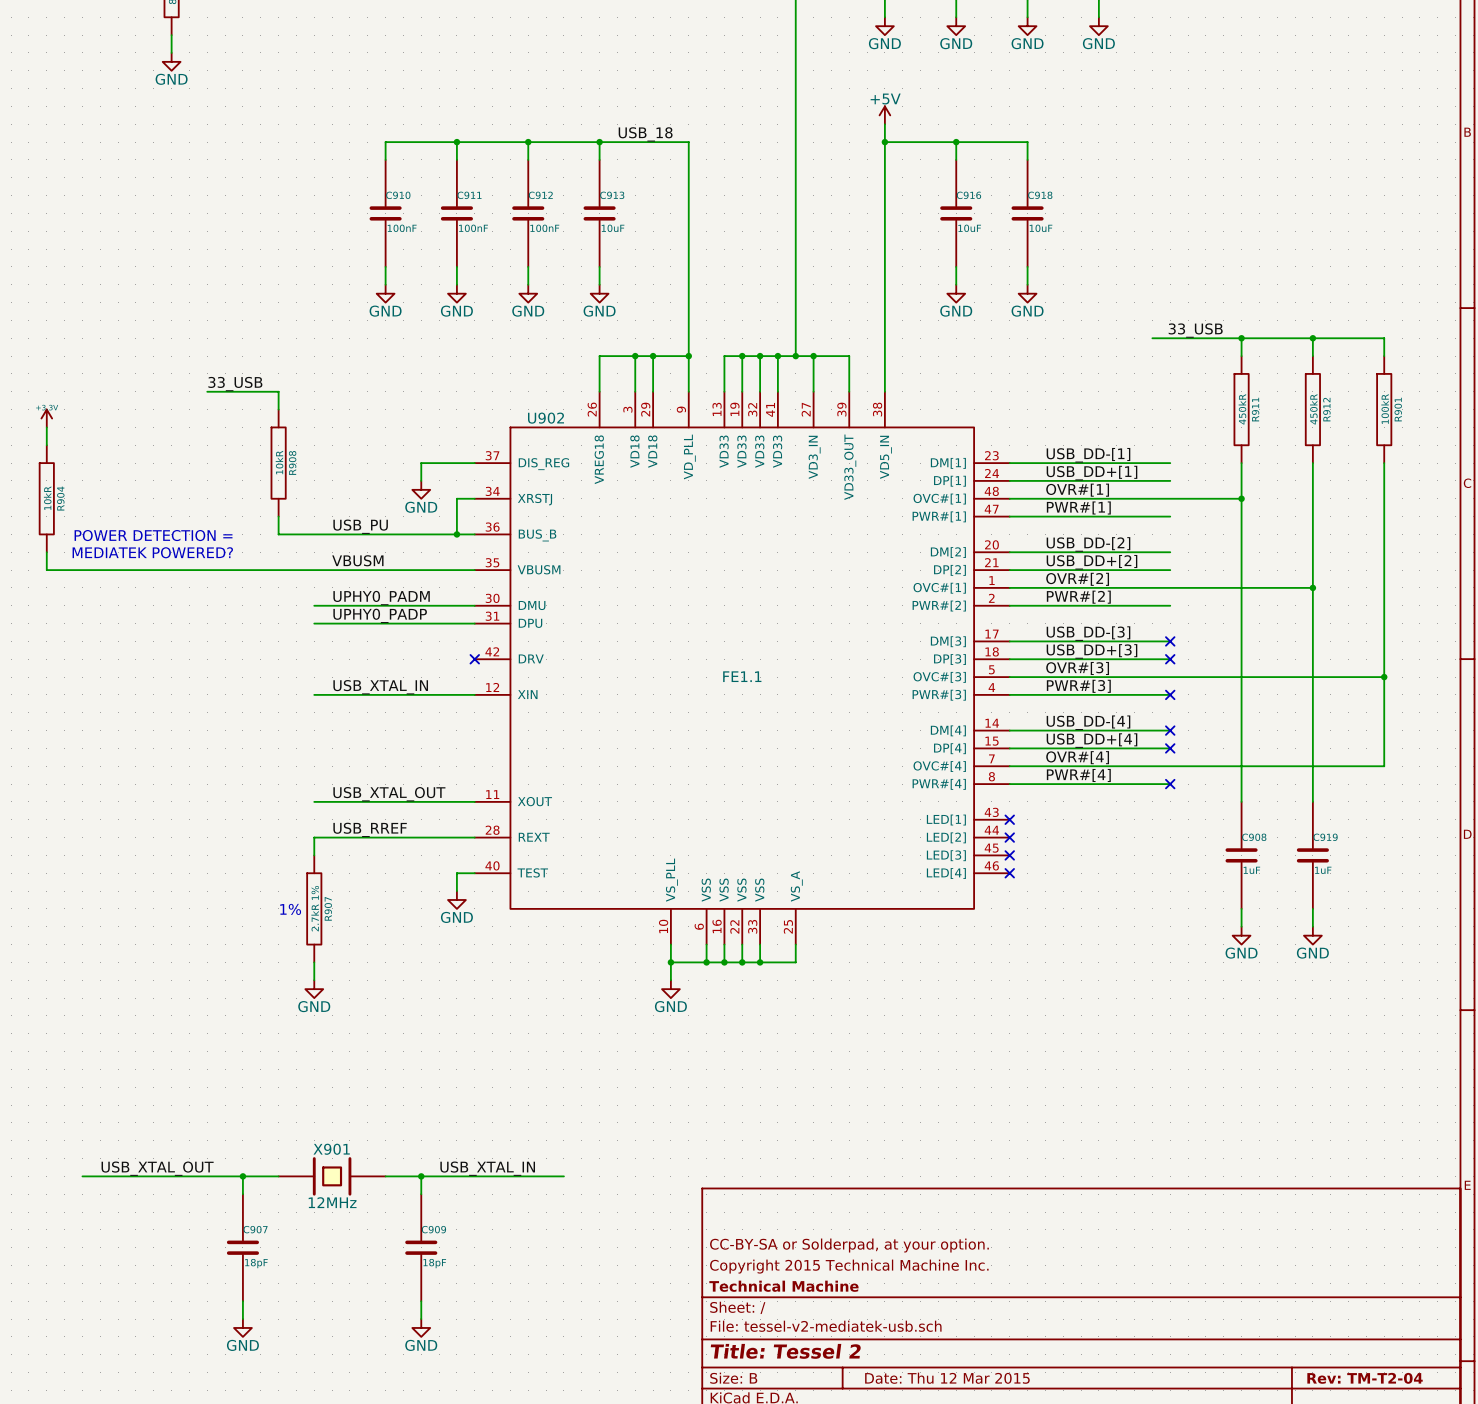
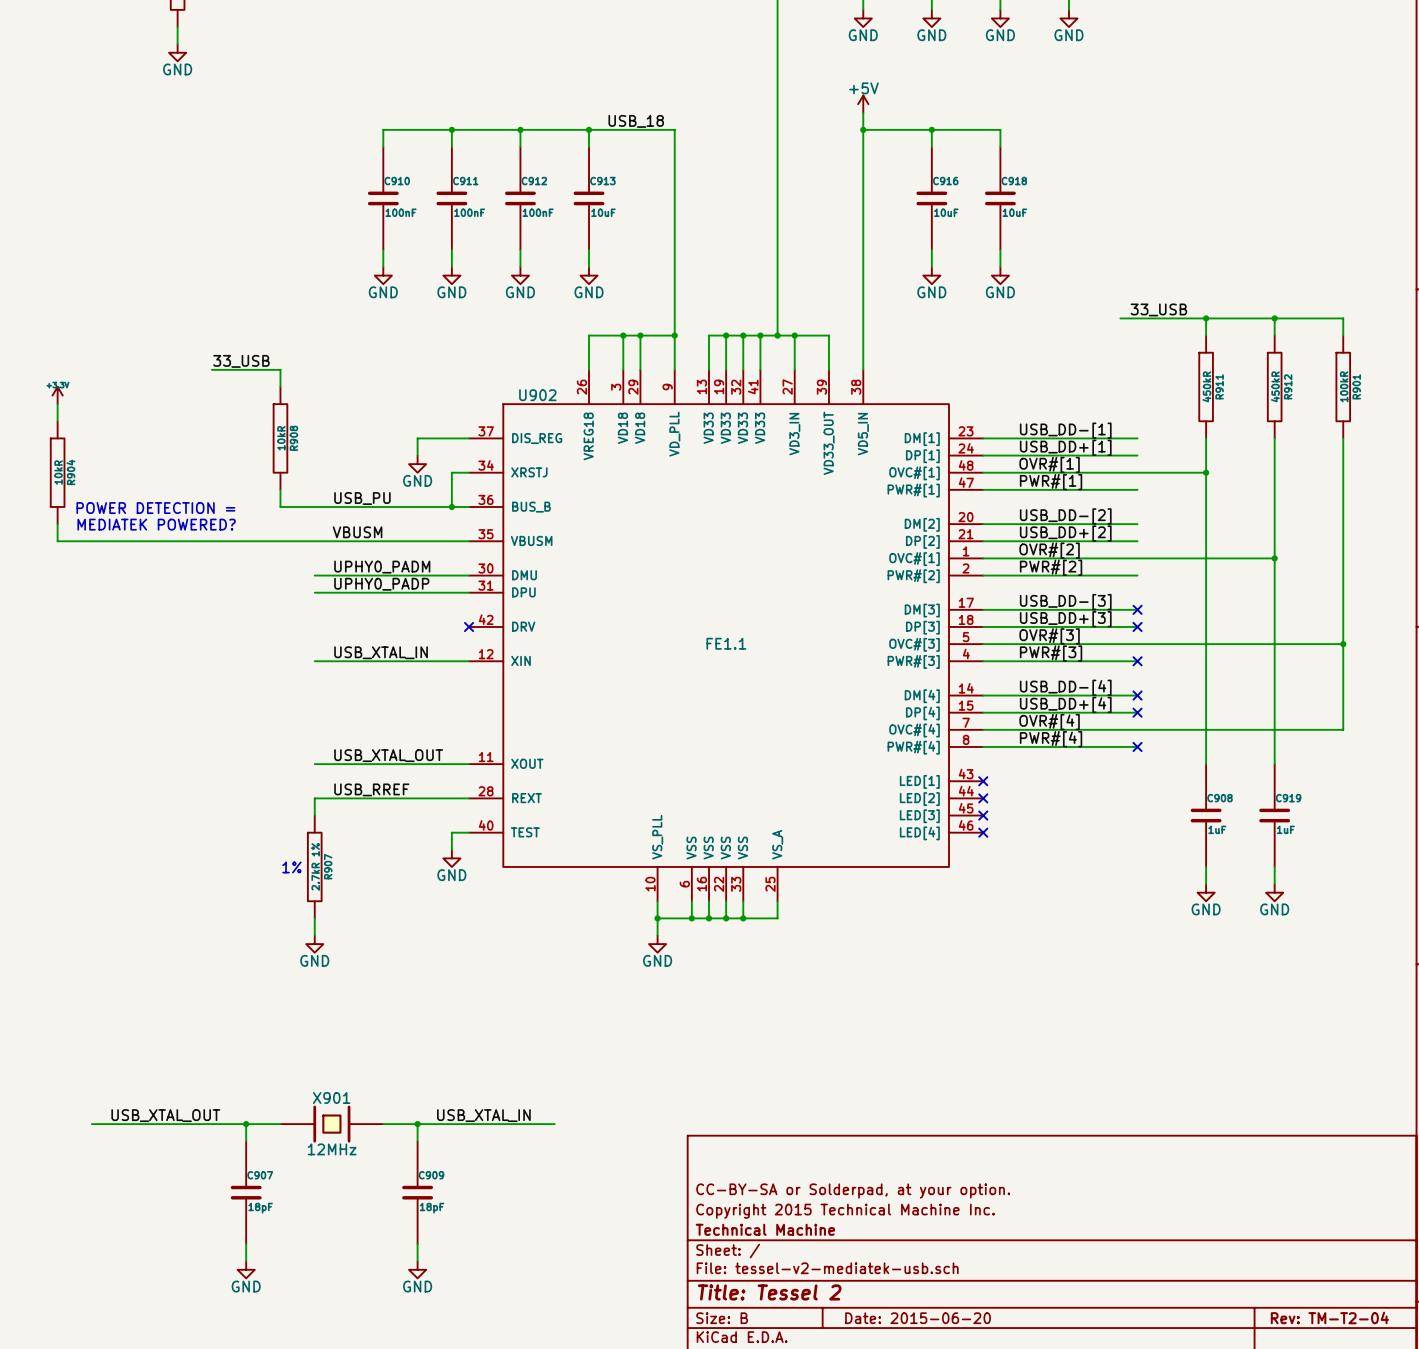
title block: Date: Thu 12 Mar 2015 (947, 1378) -> Date: 2015-06-20 (918, 1318)

